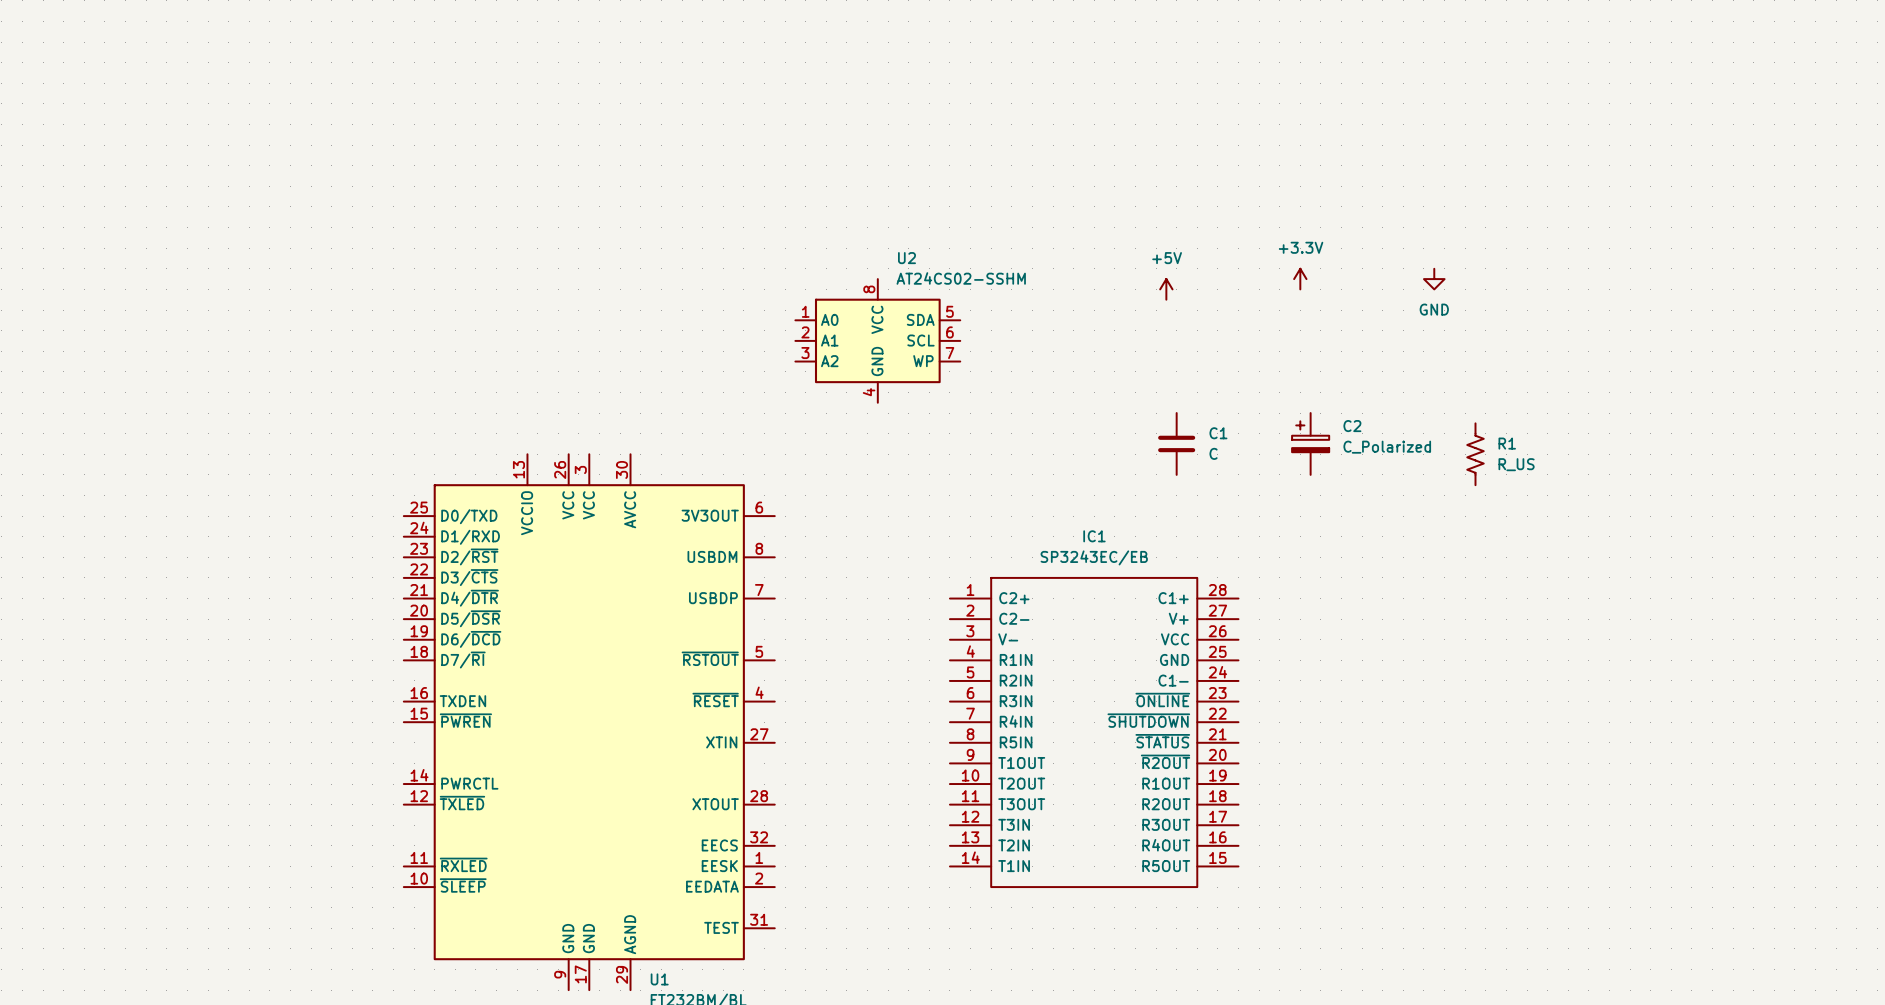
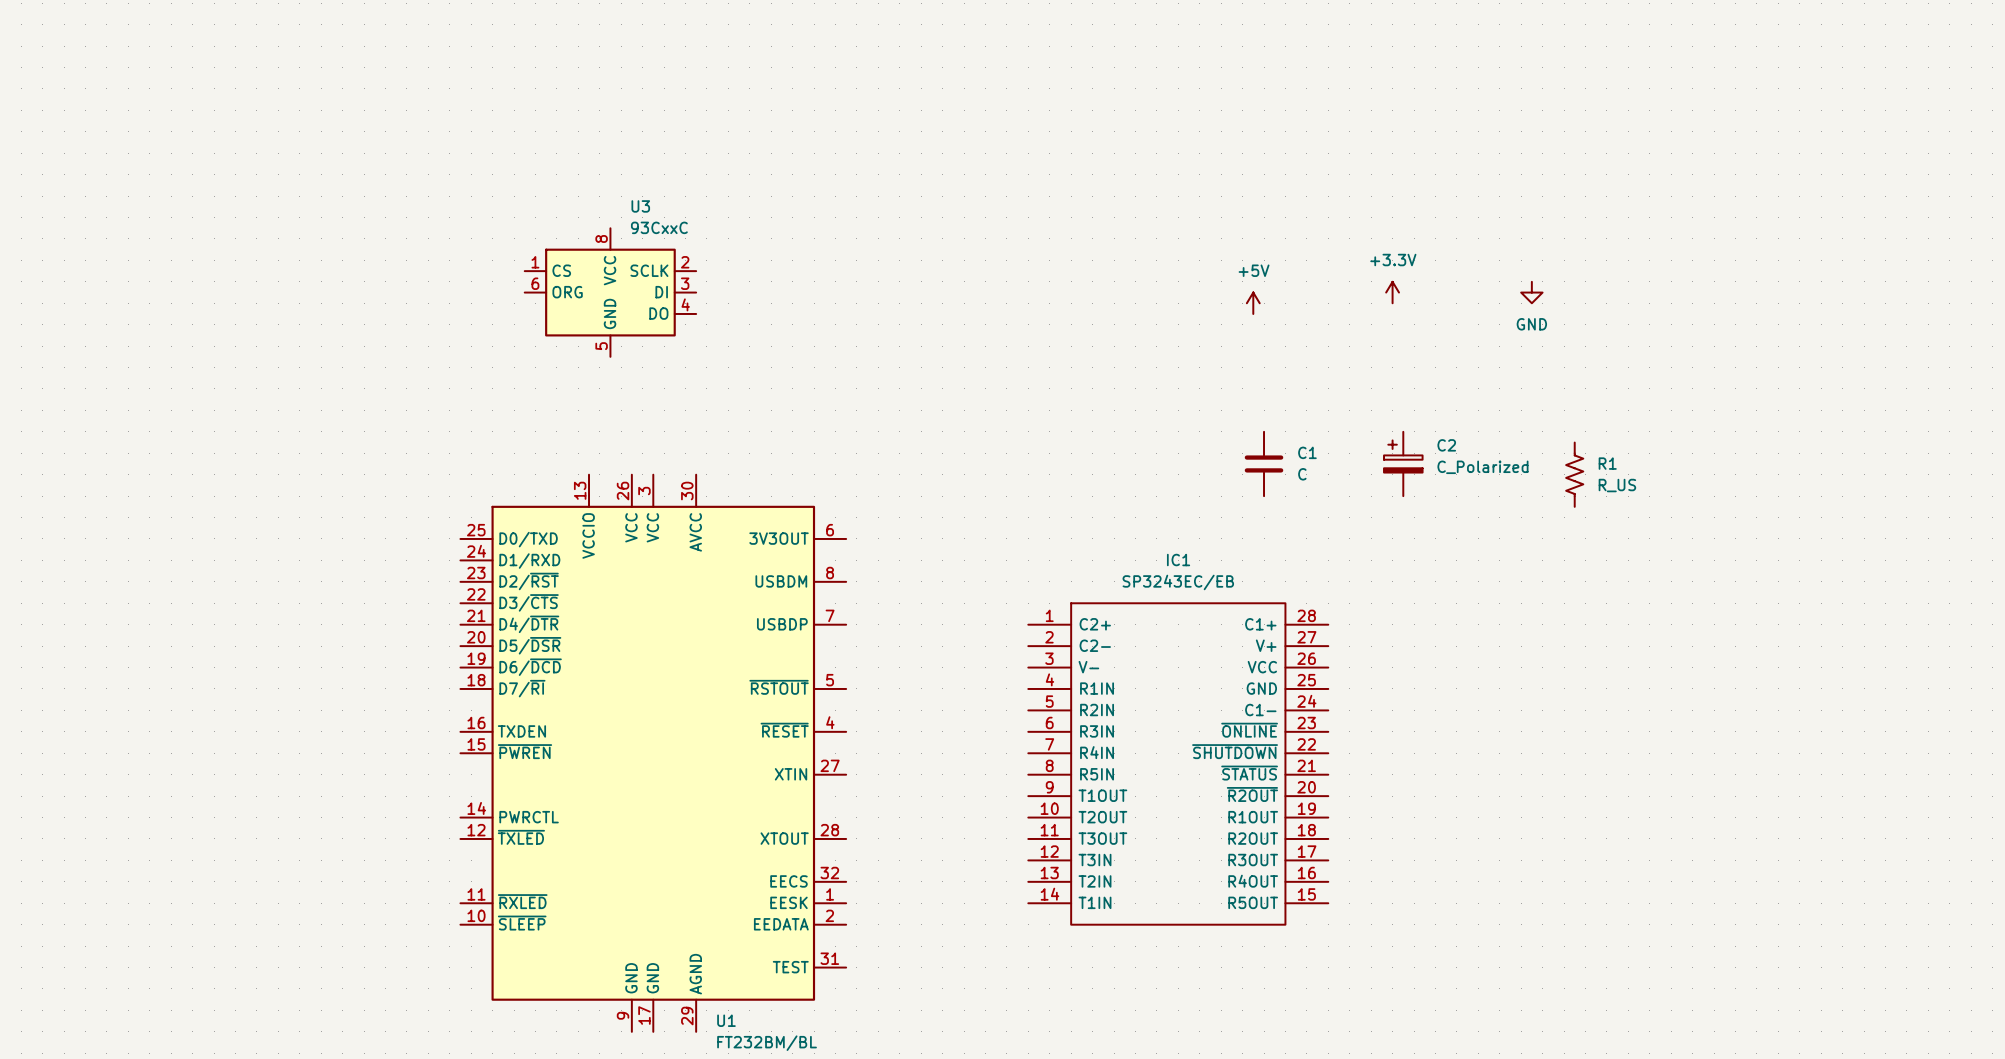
U3: none -> 93CxxC (610, 292)
U2: AT24CS02-SSHM (877, 340) -> none

